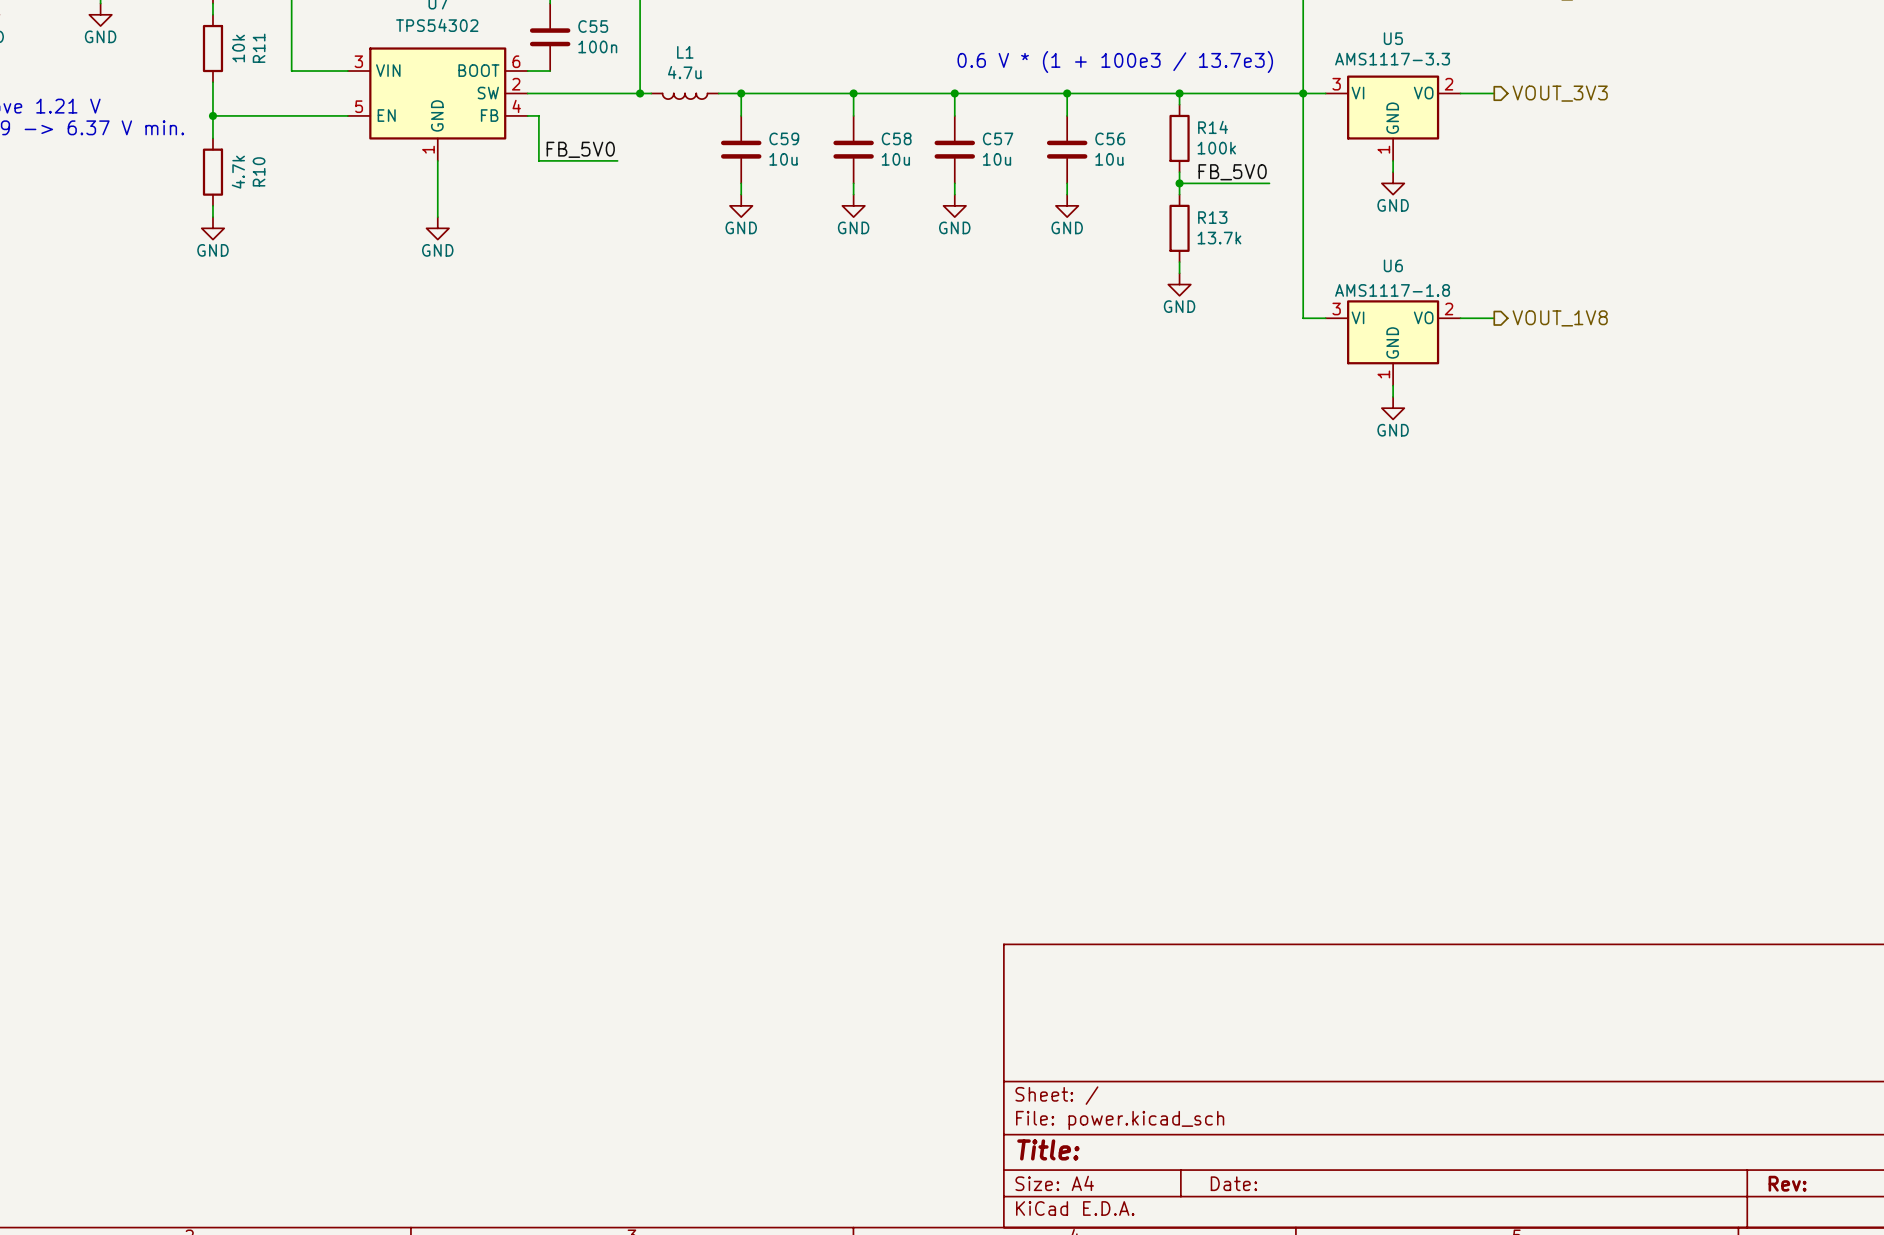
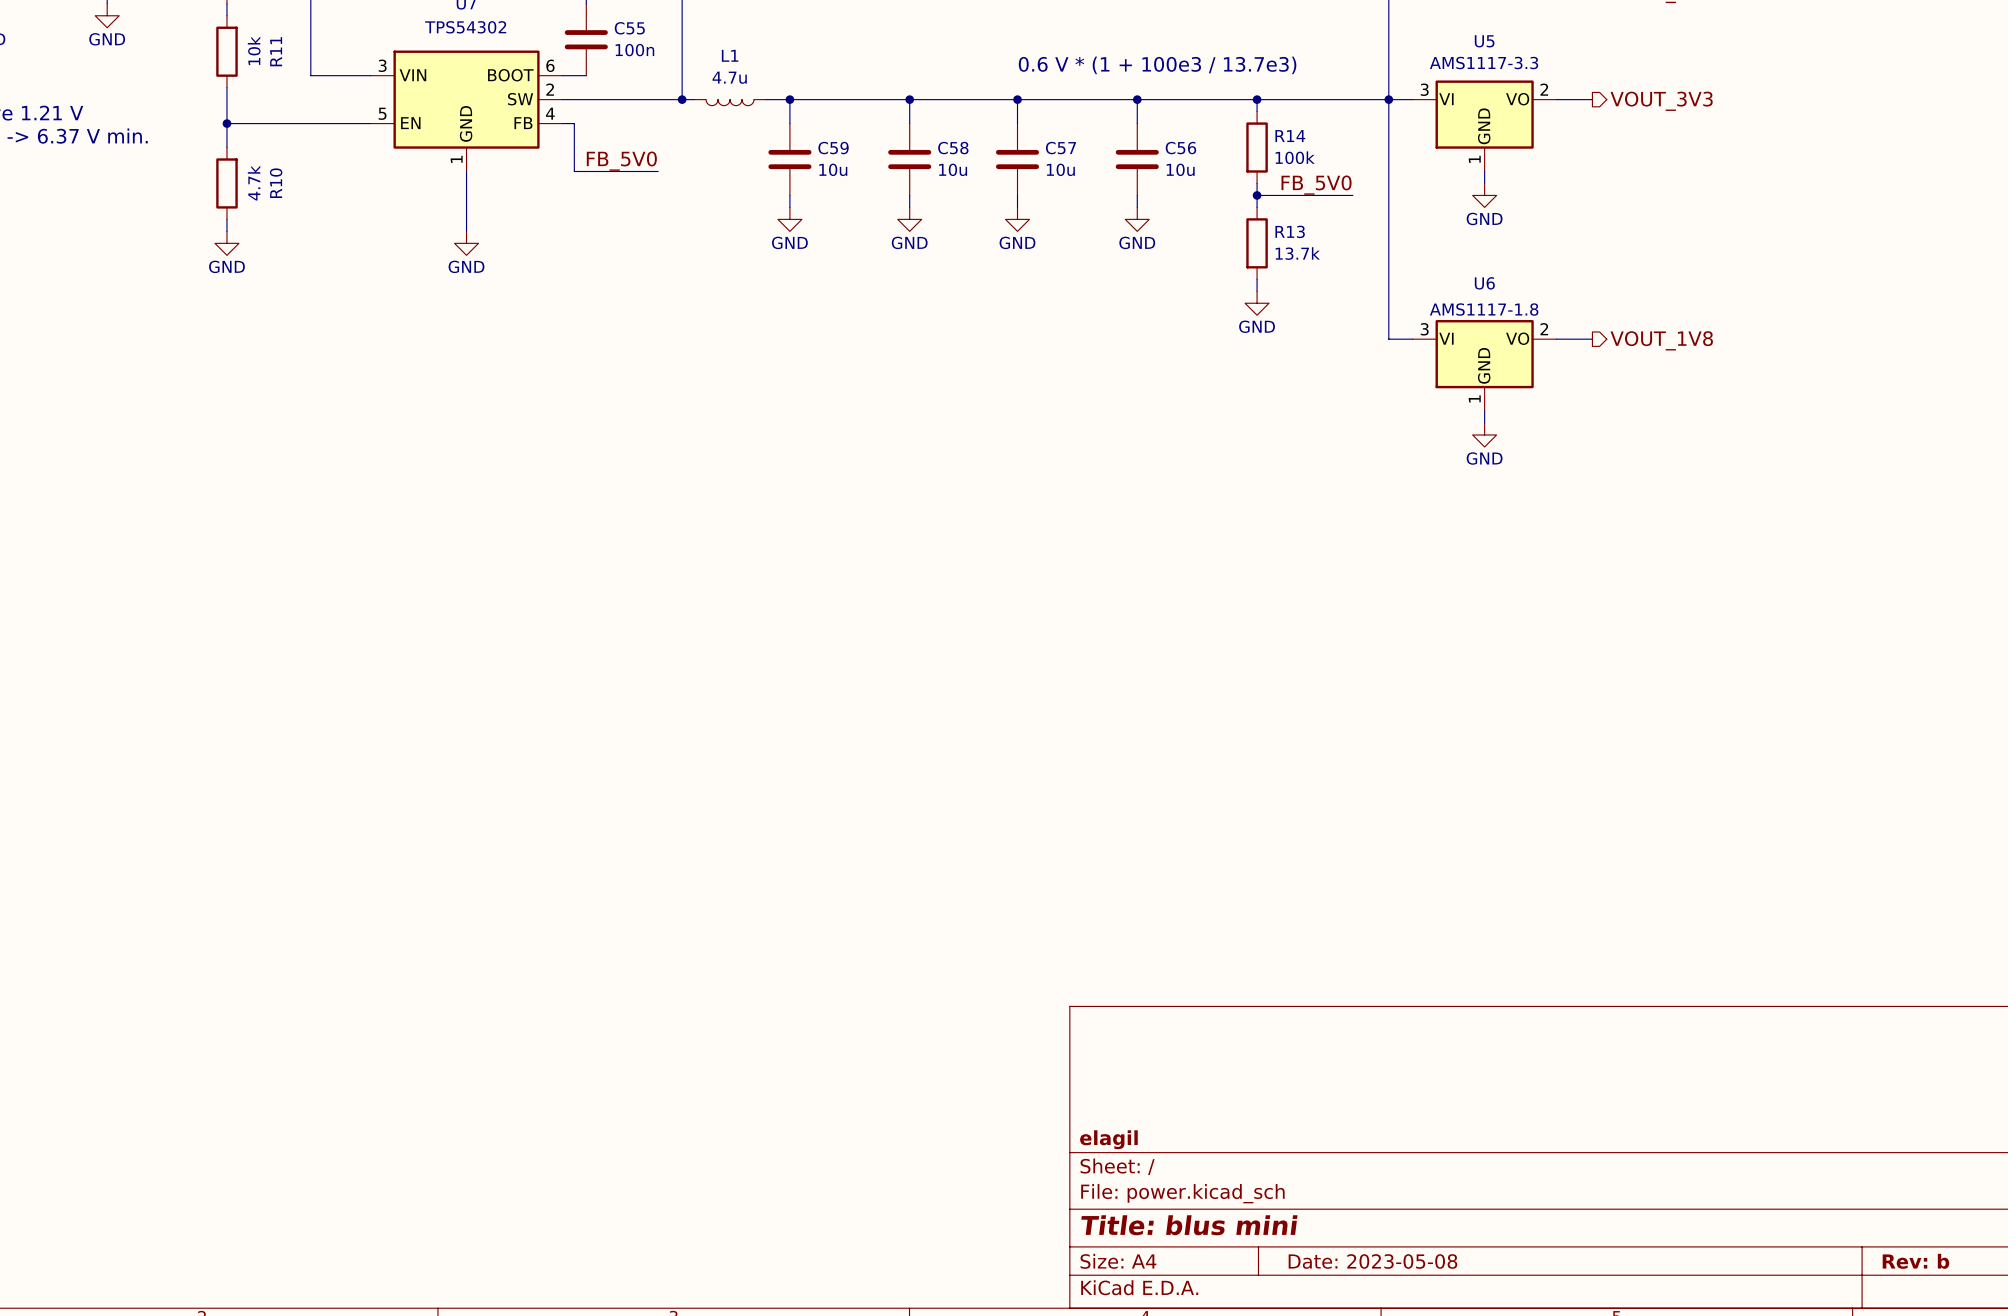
title block: none -> elagil (1108, 1139)
title block: Title: (1048, 1149) -> Title: blus mini (1189, 1225)
title block: Date: (1233, 1183) -> Date: 2023-05-08 (1372, 1261)
title block: Rev: (1787, 1183) -> Rev: b (1915, 1261)

